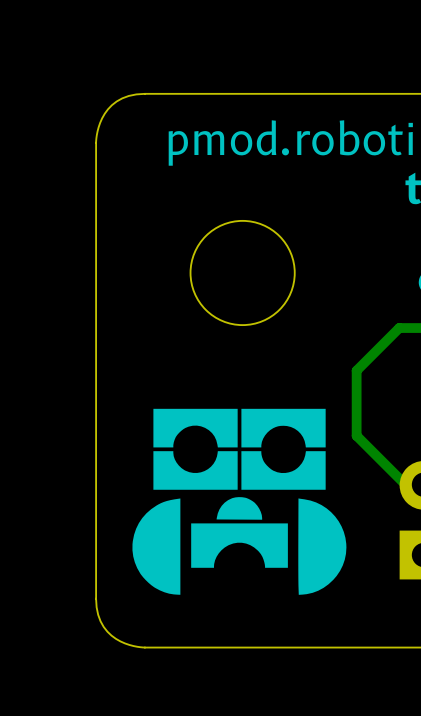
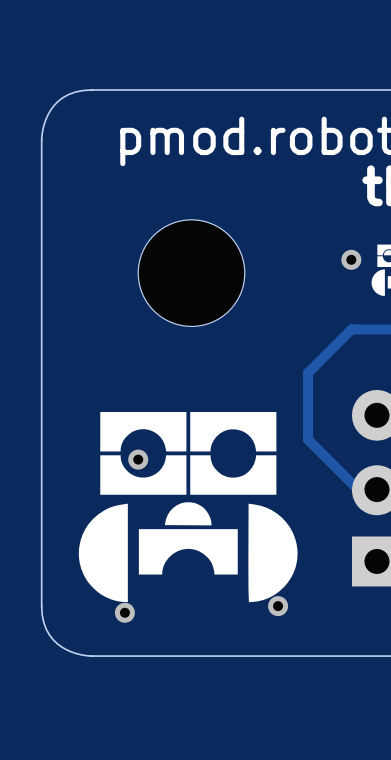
via: none -> (351, 259)
via: none -> (138, 459)
via: none -> (278, 606)
via: none -> (124, 612)

